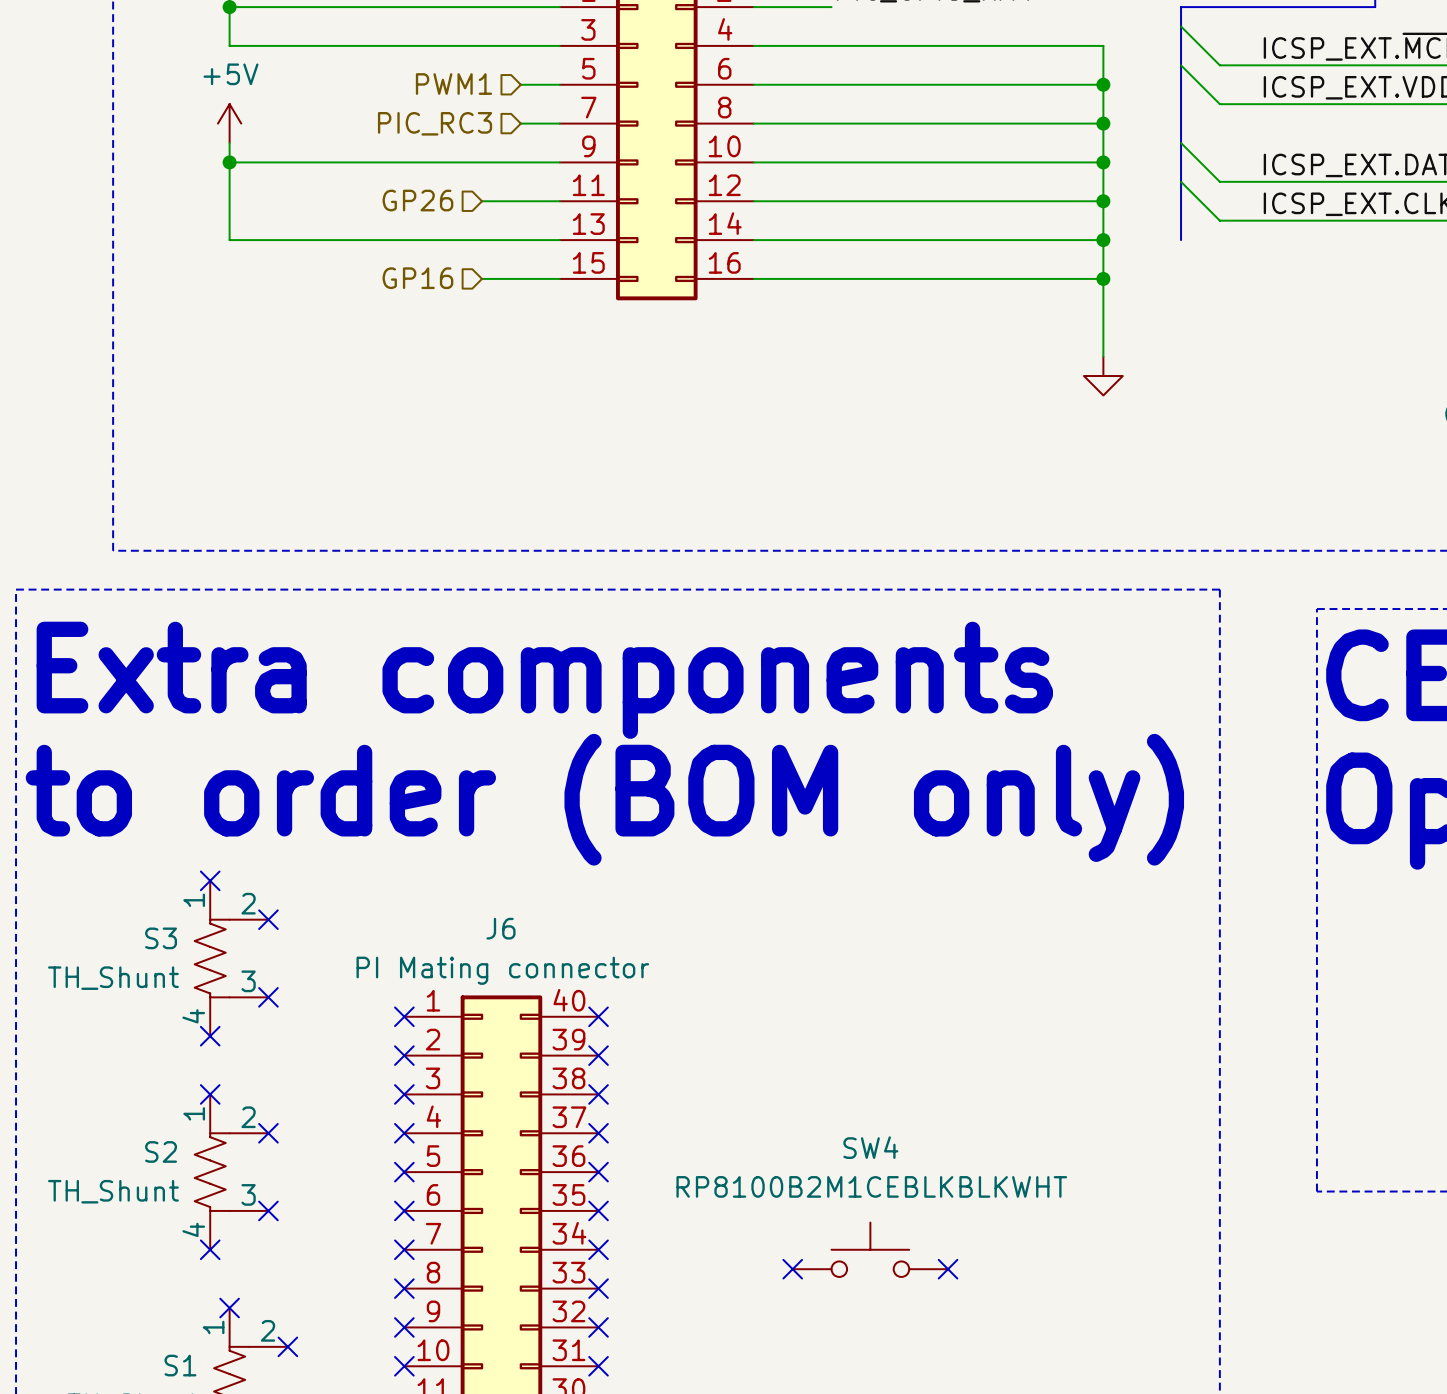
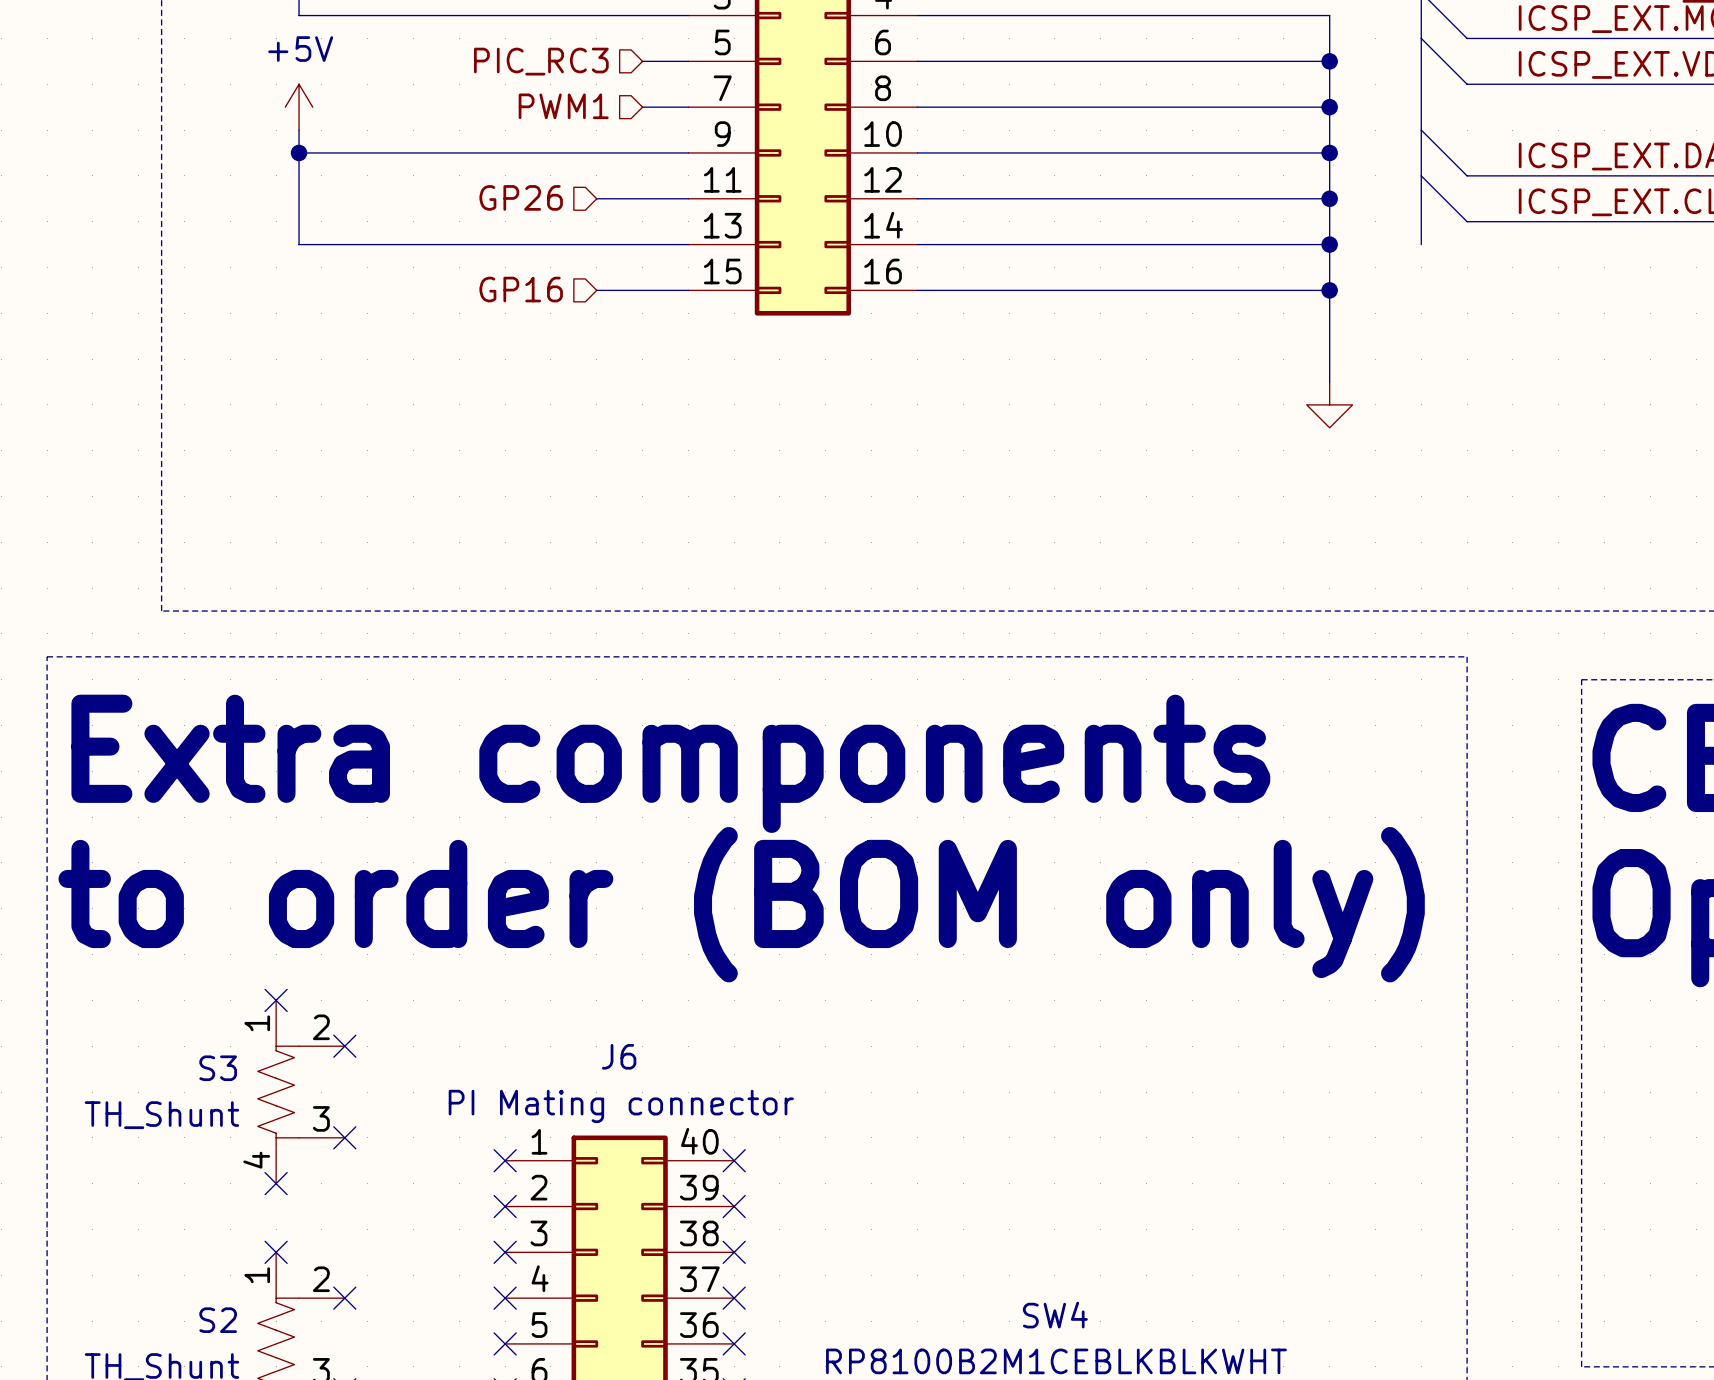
hierarchical label: PWM1 (453, 84) -> PIC_RC3 (541, 61)
hierarchical label: PIC_RC3 (435, 123) -> PWM1 (563, 106)

